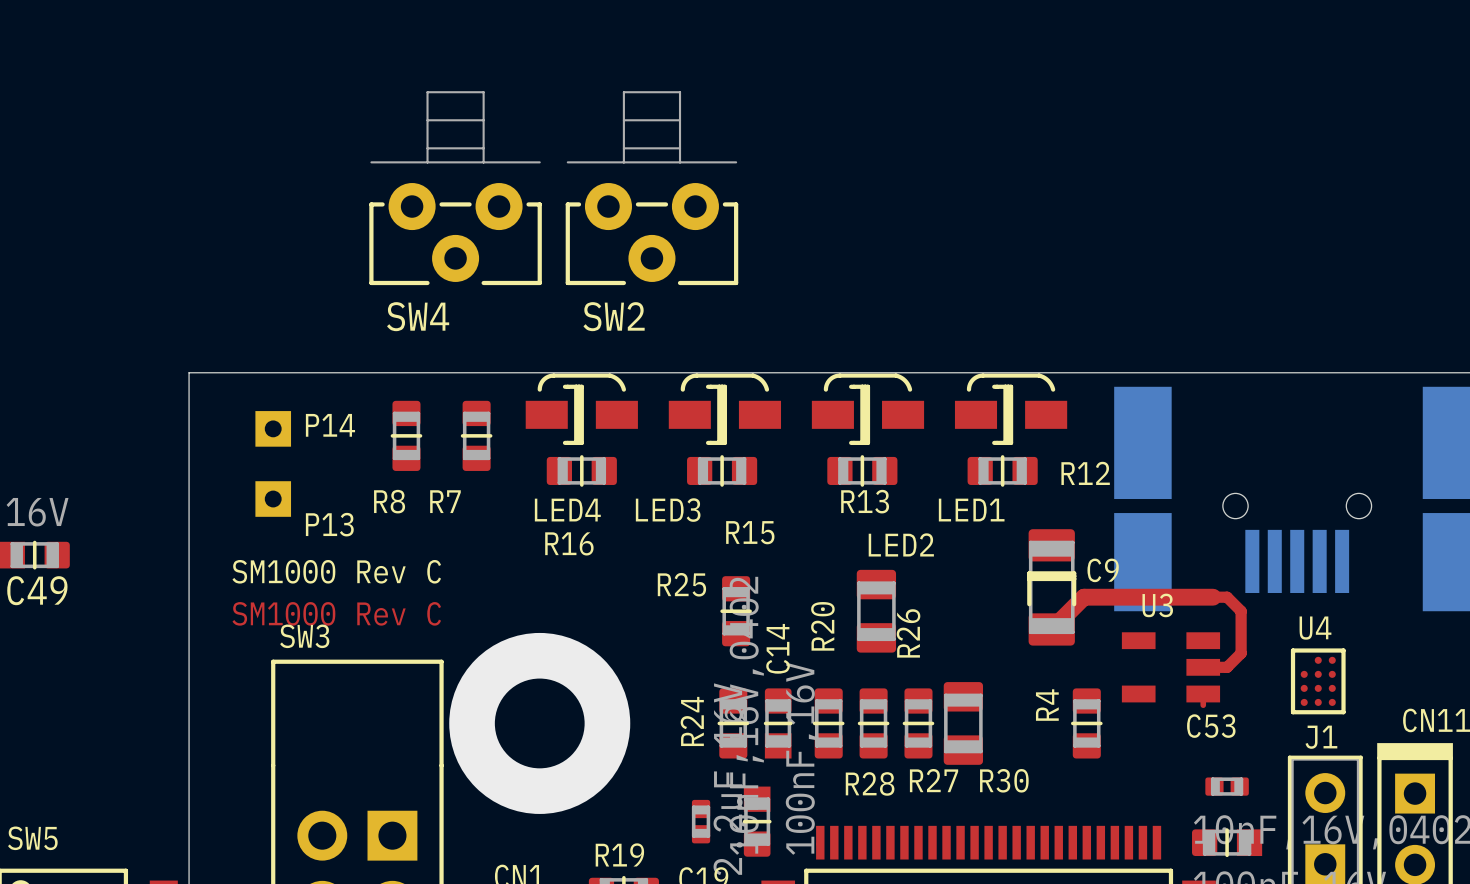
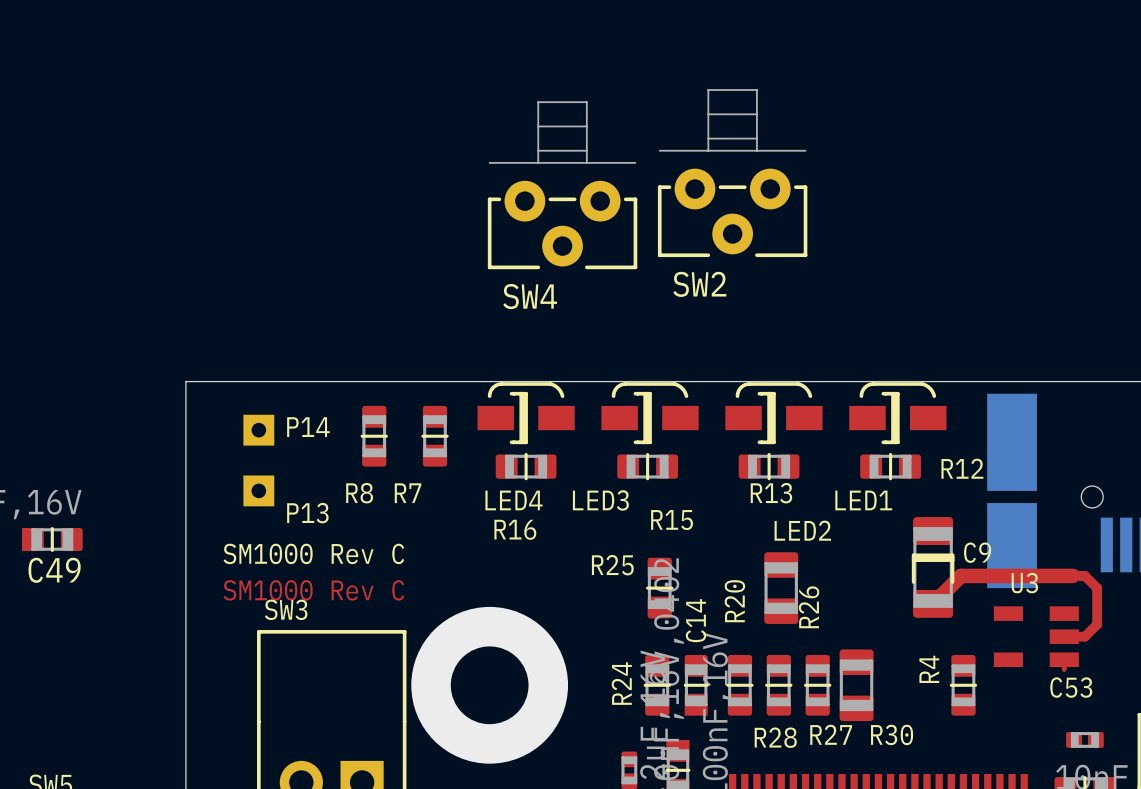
SW4 position: (455, 188) -> (562, 185)
SW2 position: (651, 188) -> (732, 173)

